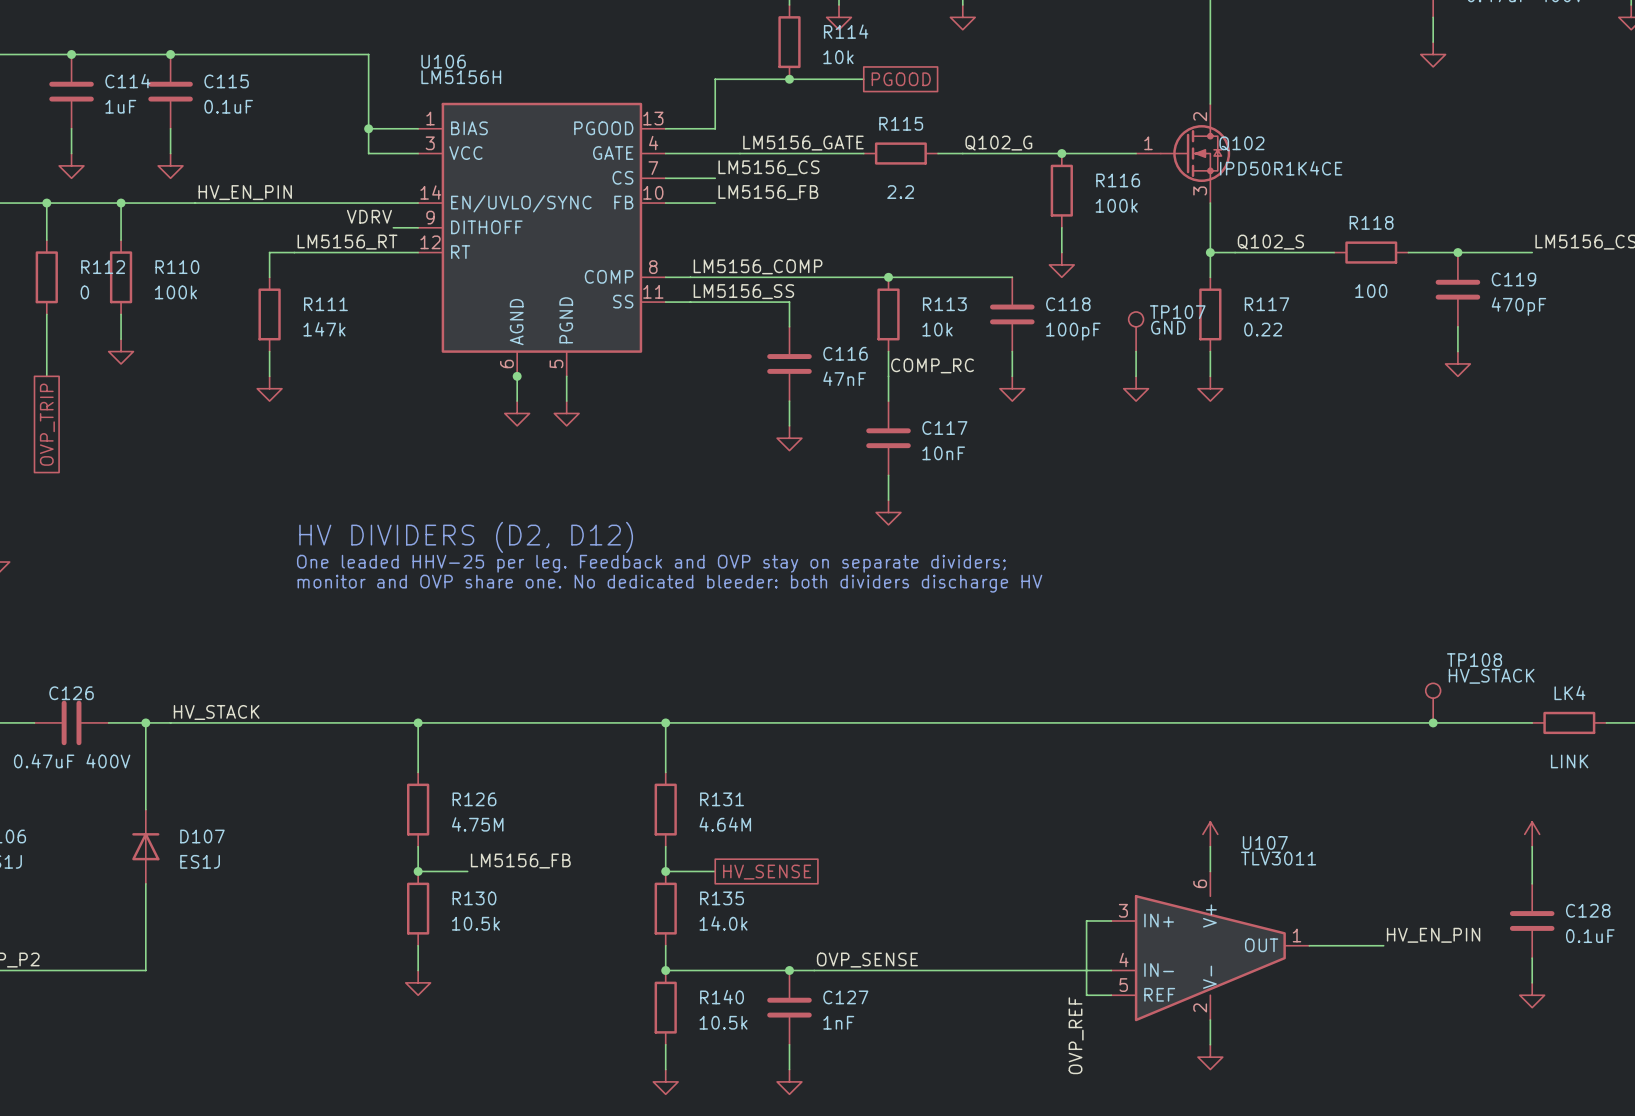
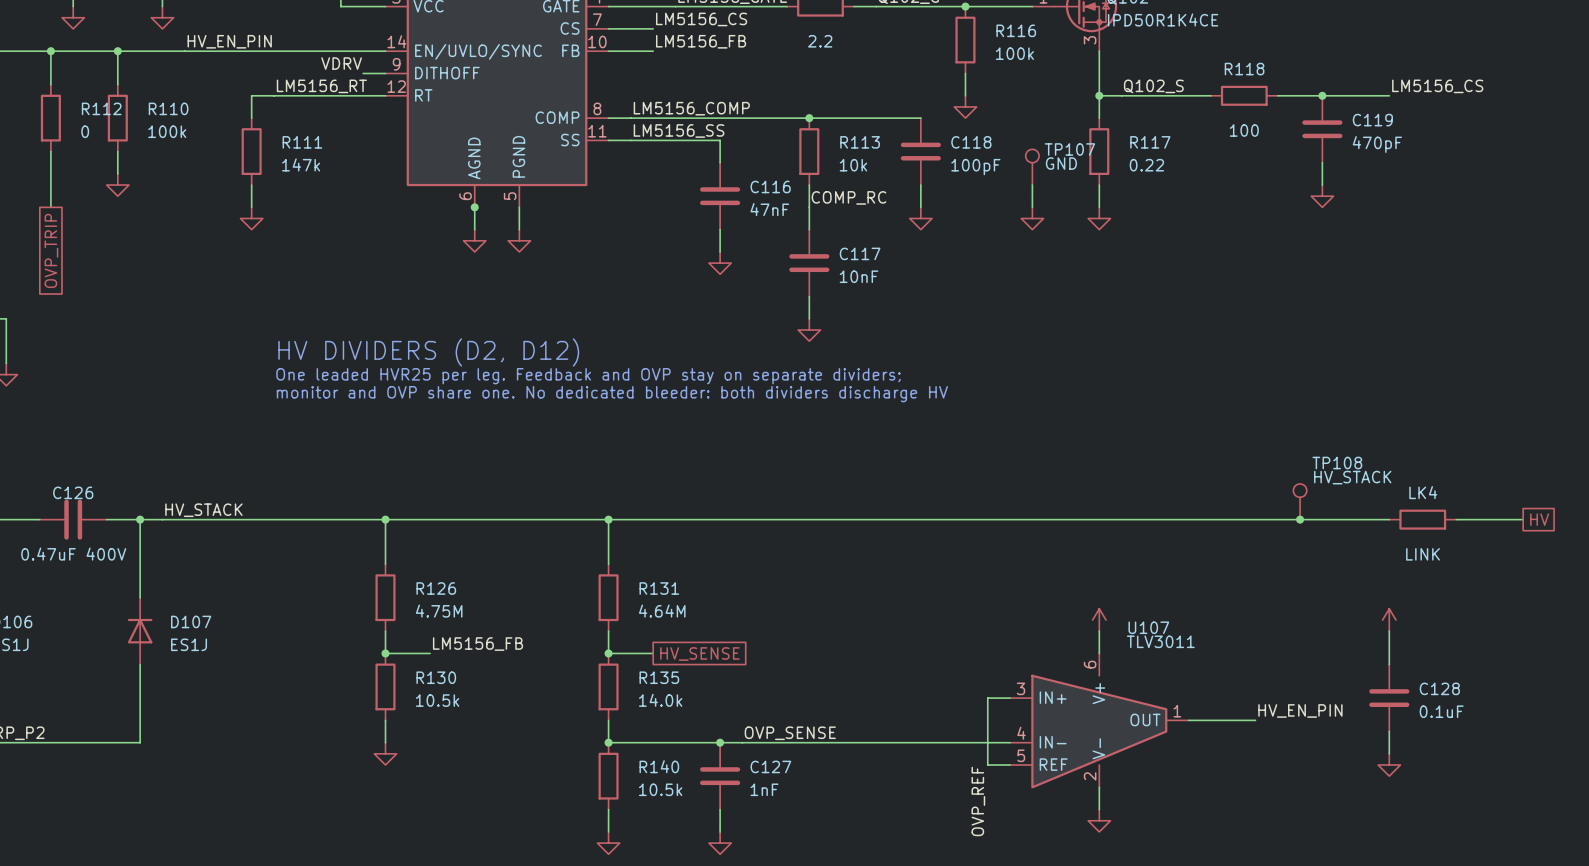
text: One leaded HHV-25 per leg. Feedback and OVP stay on separate dividers; (651, 563) -> One leaded HVR25 per leg. Feedback and OVP stay on separate dividers; (588, 376)

